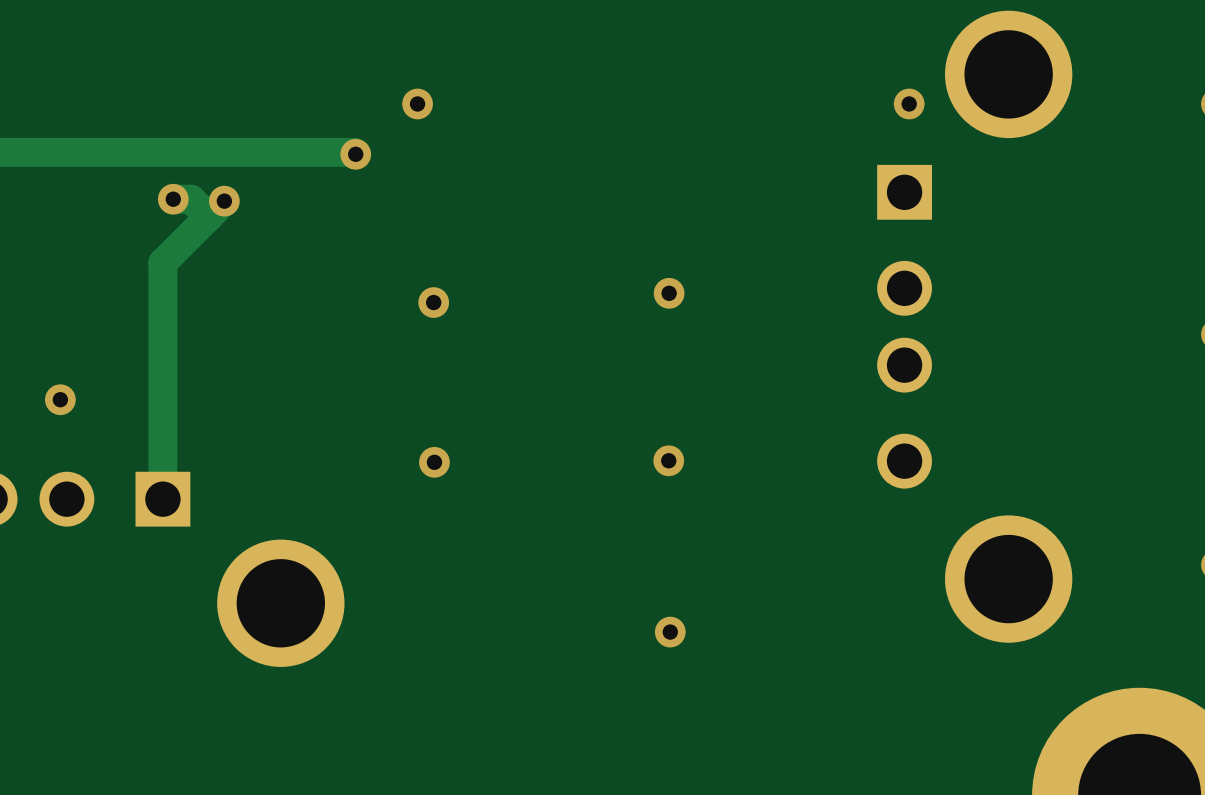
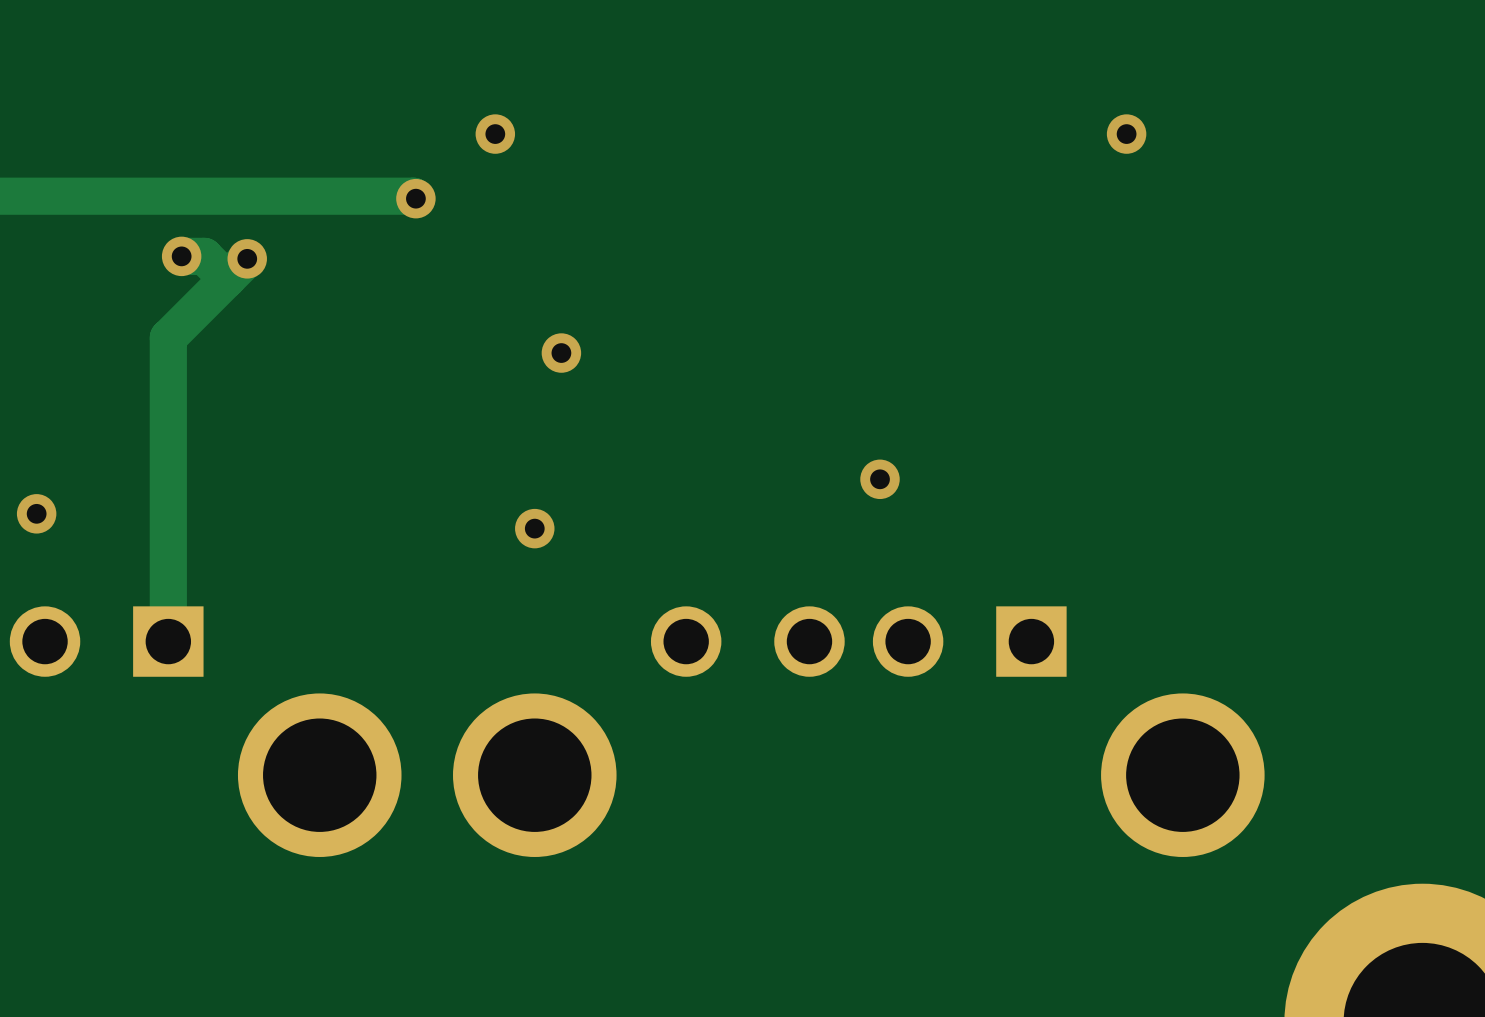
via: (669, 293) -> none
via position: (433, 302) -> (561, 353)
part rotation: 0° (974, 326) -> 90° clockwise (858, 731)
via: none -> (880, 479)
via: (668, 460) -> none
via position: (434, 462) -> (534, 528)
via: (670, 632) -> none

